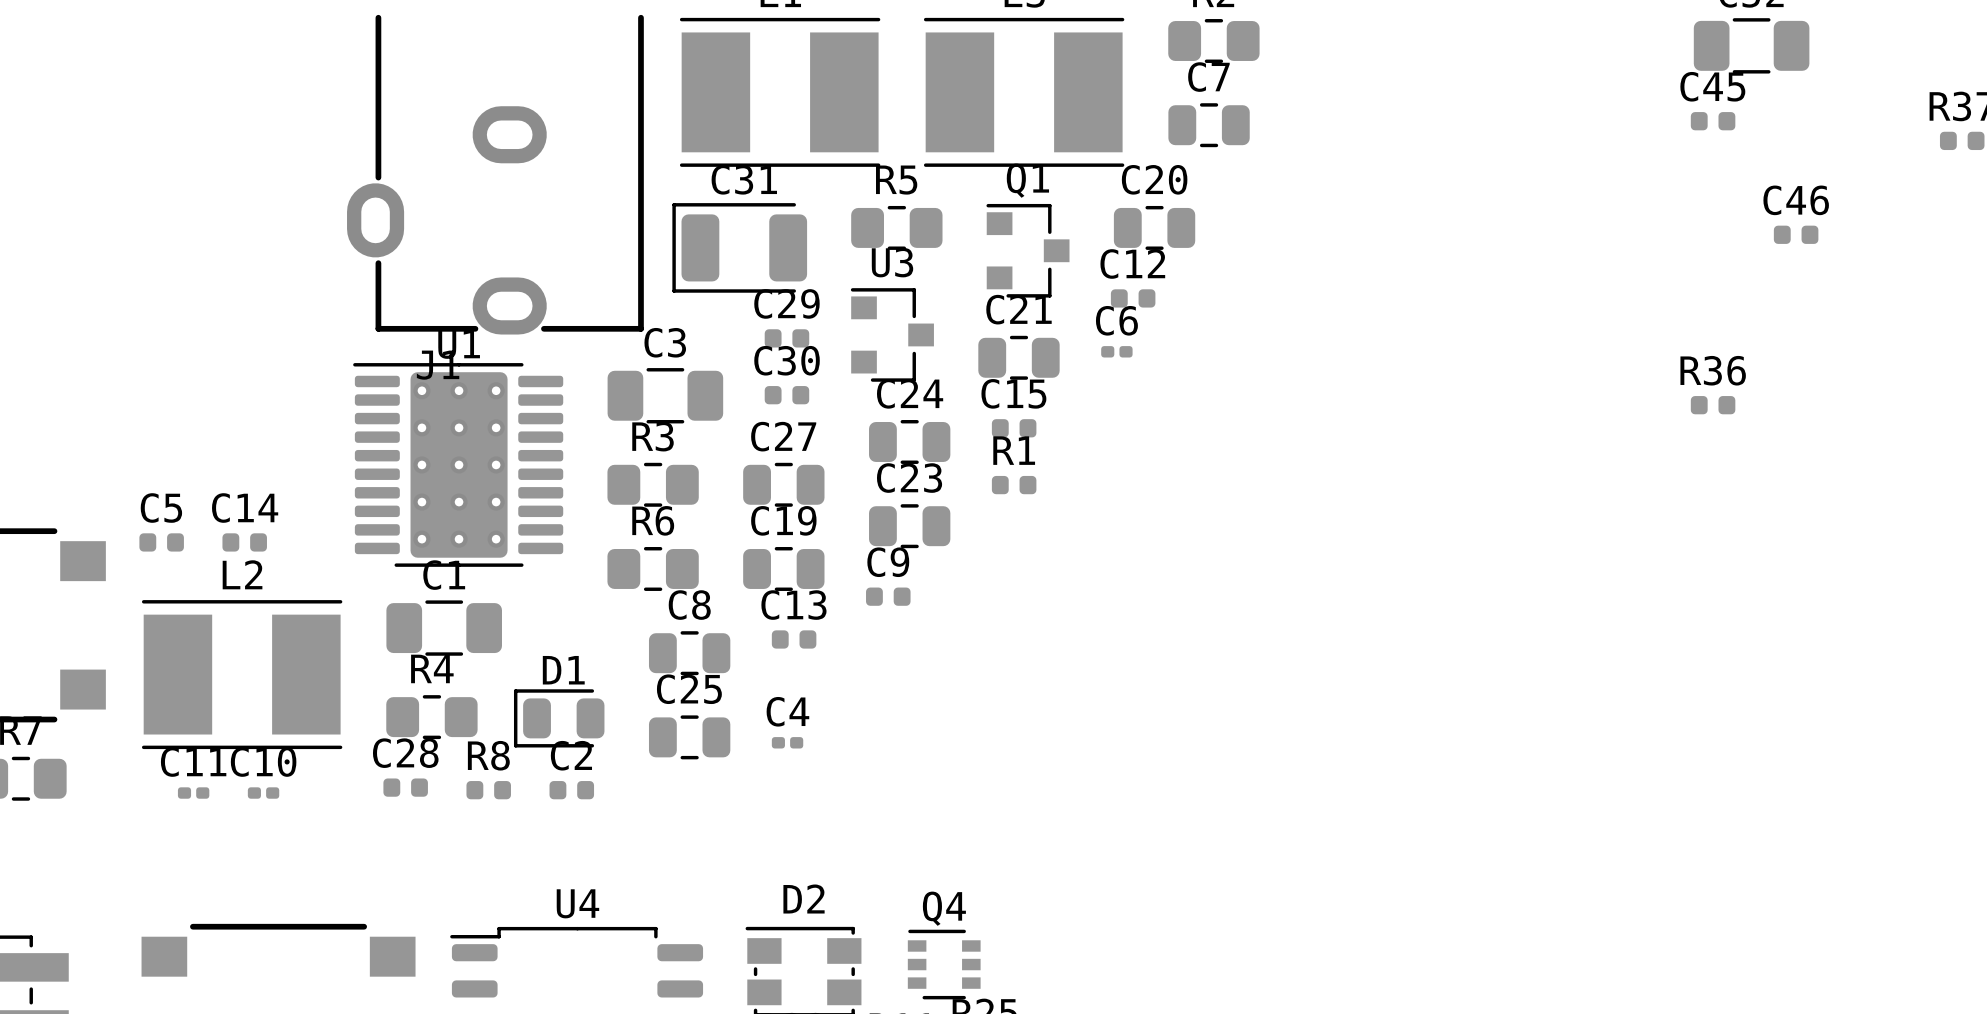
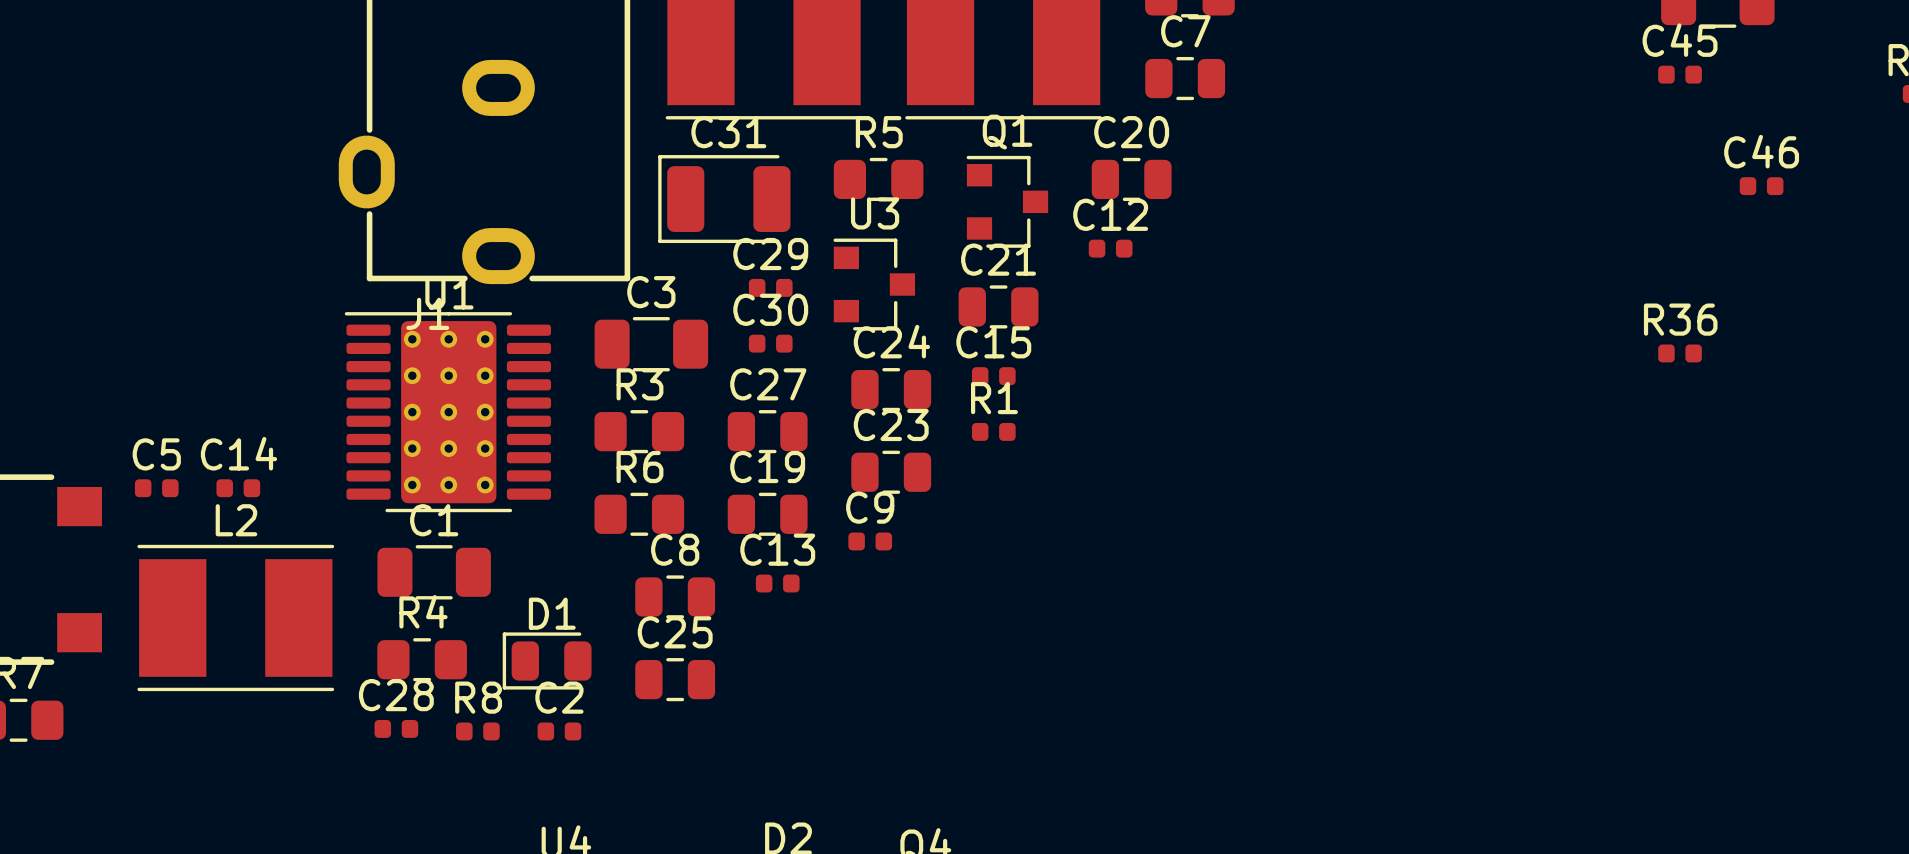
C6: (1116, 351) -> none
C4: (787, 742) -> none
C11: (193, 793) -> none
C10: (263, 793) -> none

